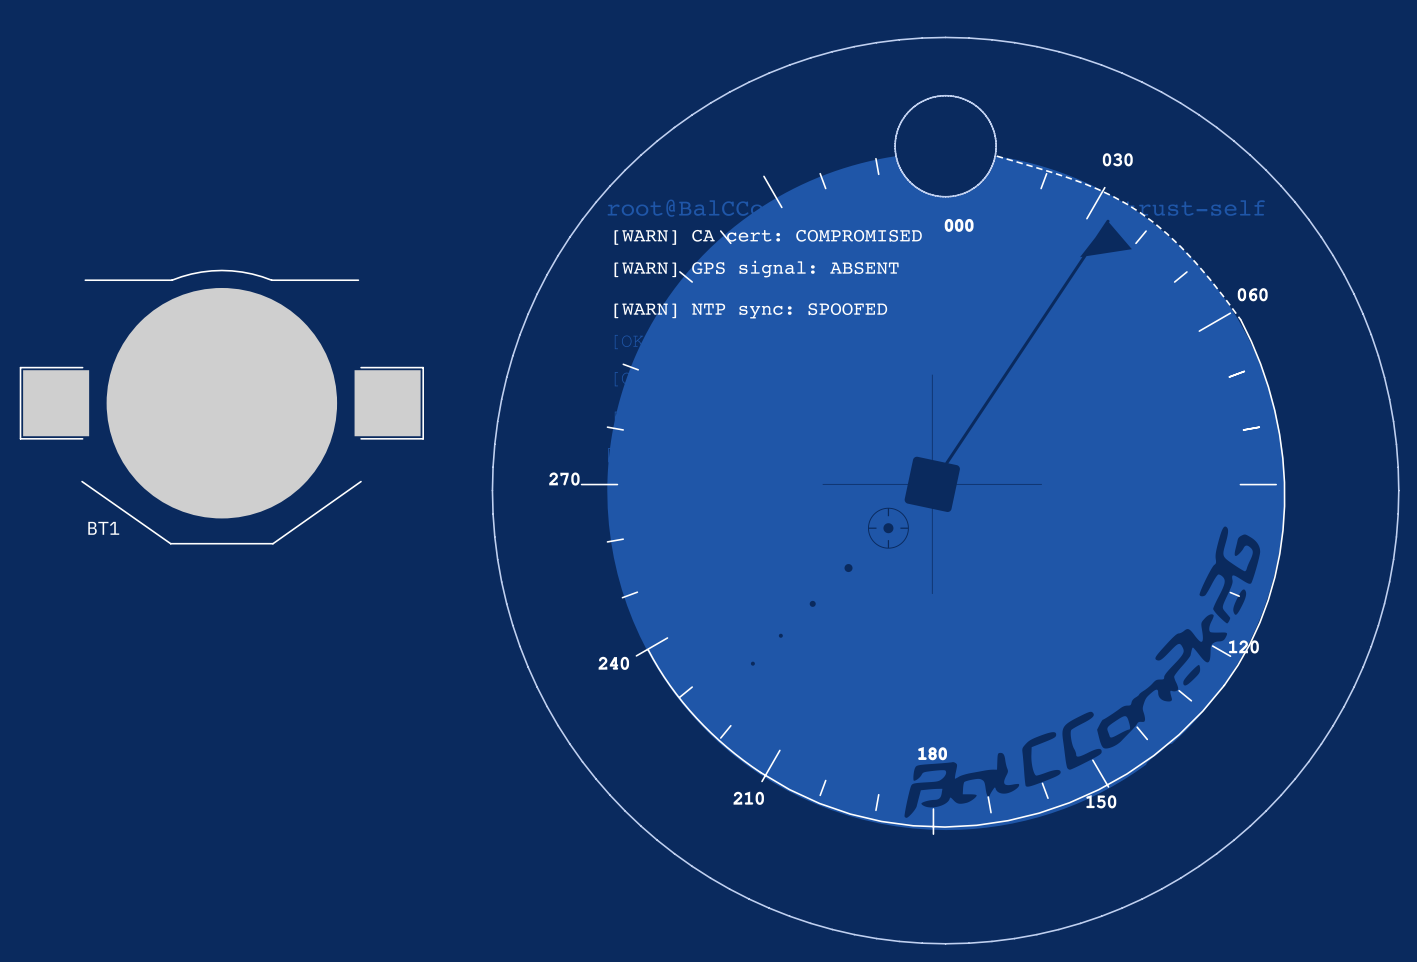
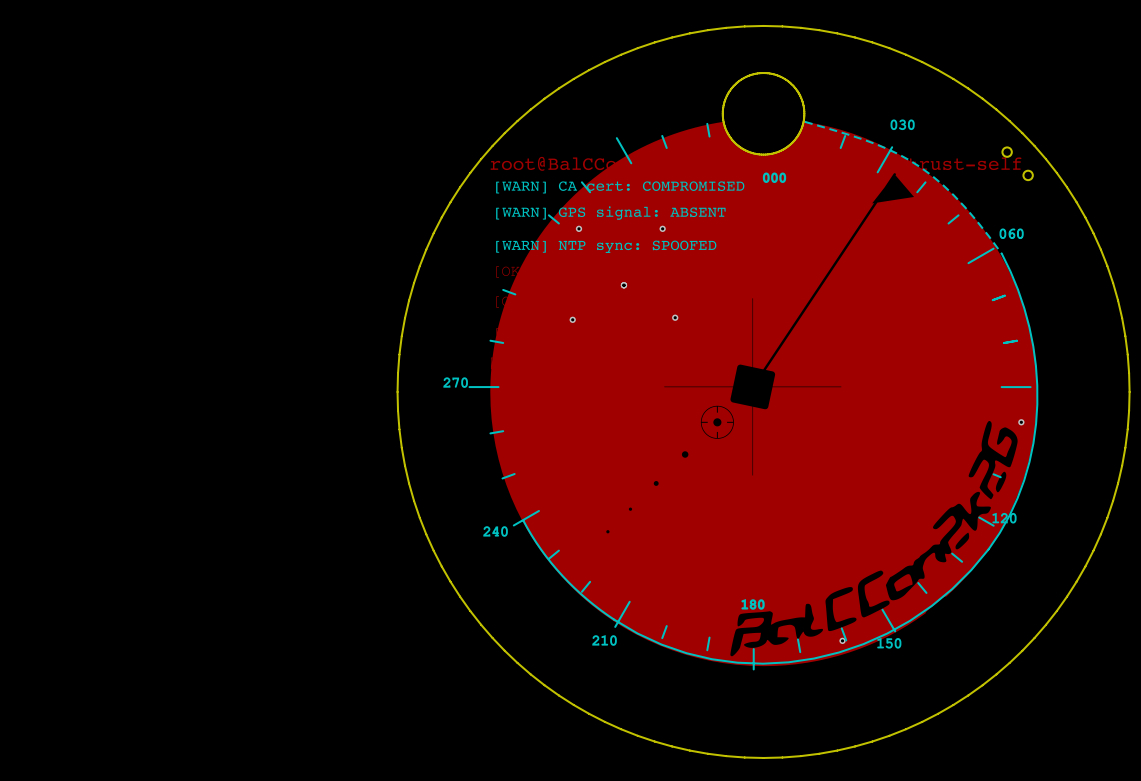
part: none -> (1017, 163)
via: none -> (578, 228)
via: none -> (662, 228)
via: none -> (623, 285)
via: none -> (675, 317)
via: none -> (572, 319)
BT1: (221, 407) -> none
via: none -> (1021, 422)
via: none -> (842, 640)

